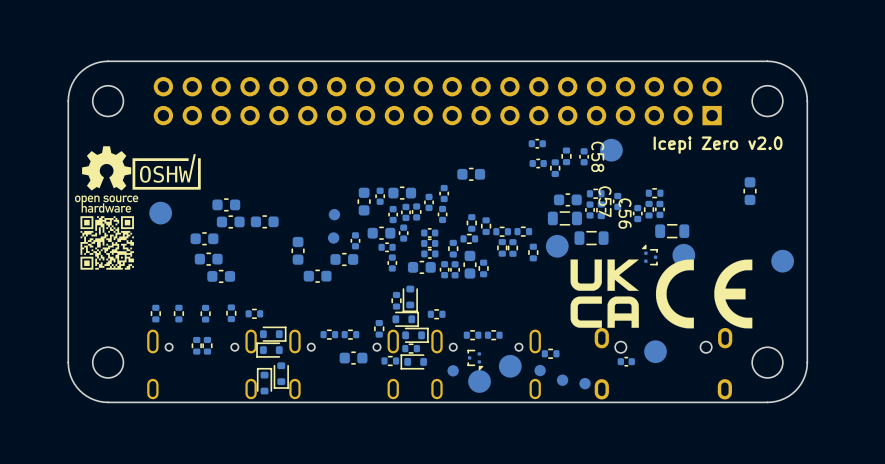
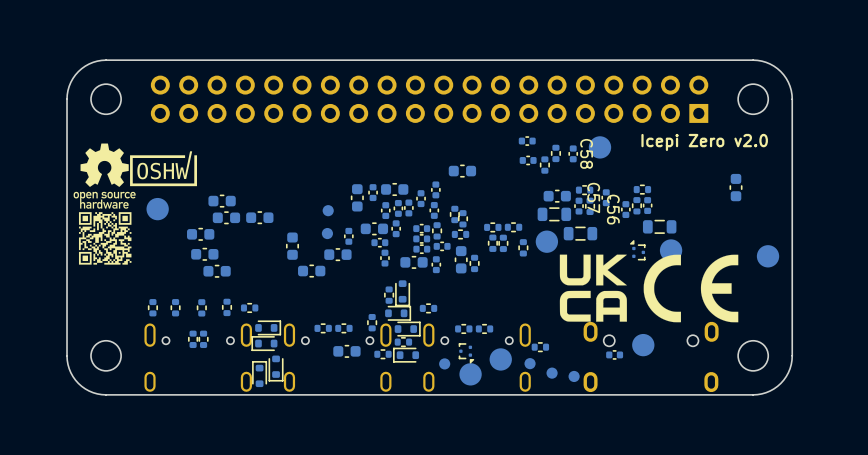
part: none -> (454, 214)
part: (486, 226) -> none
part: none -> (437, 230)
part footprint: [448, 239, 459, 258] -> [433, 241, 451, 252]
part: (455, 269) -> none

